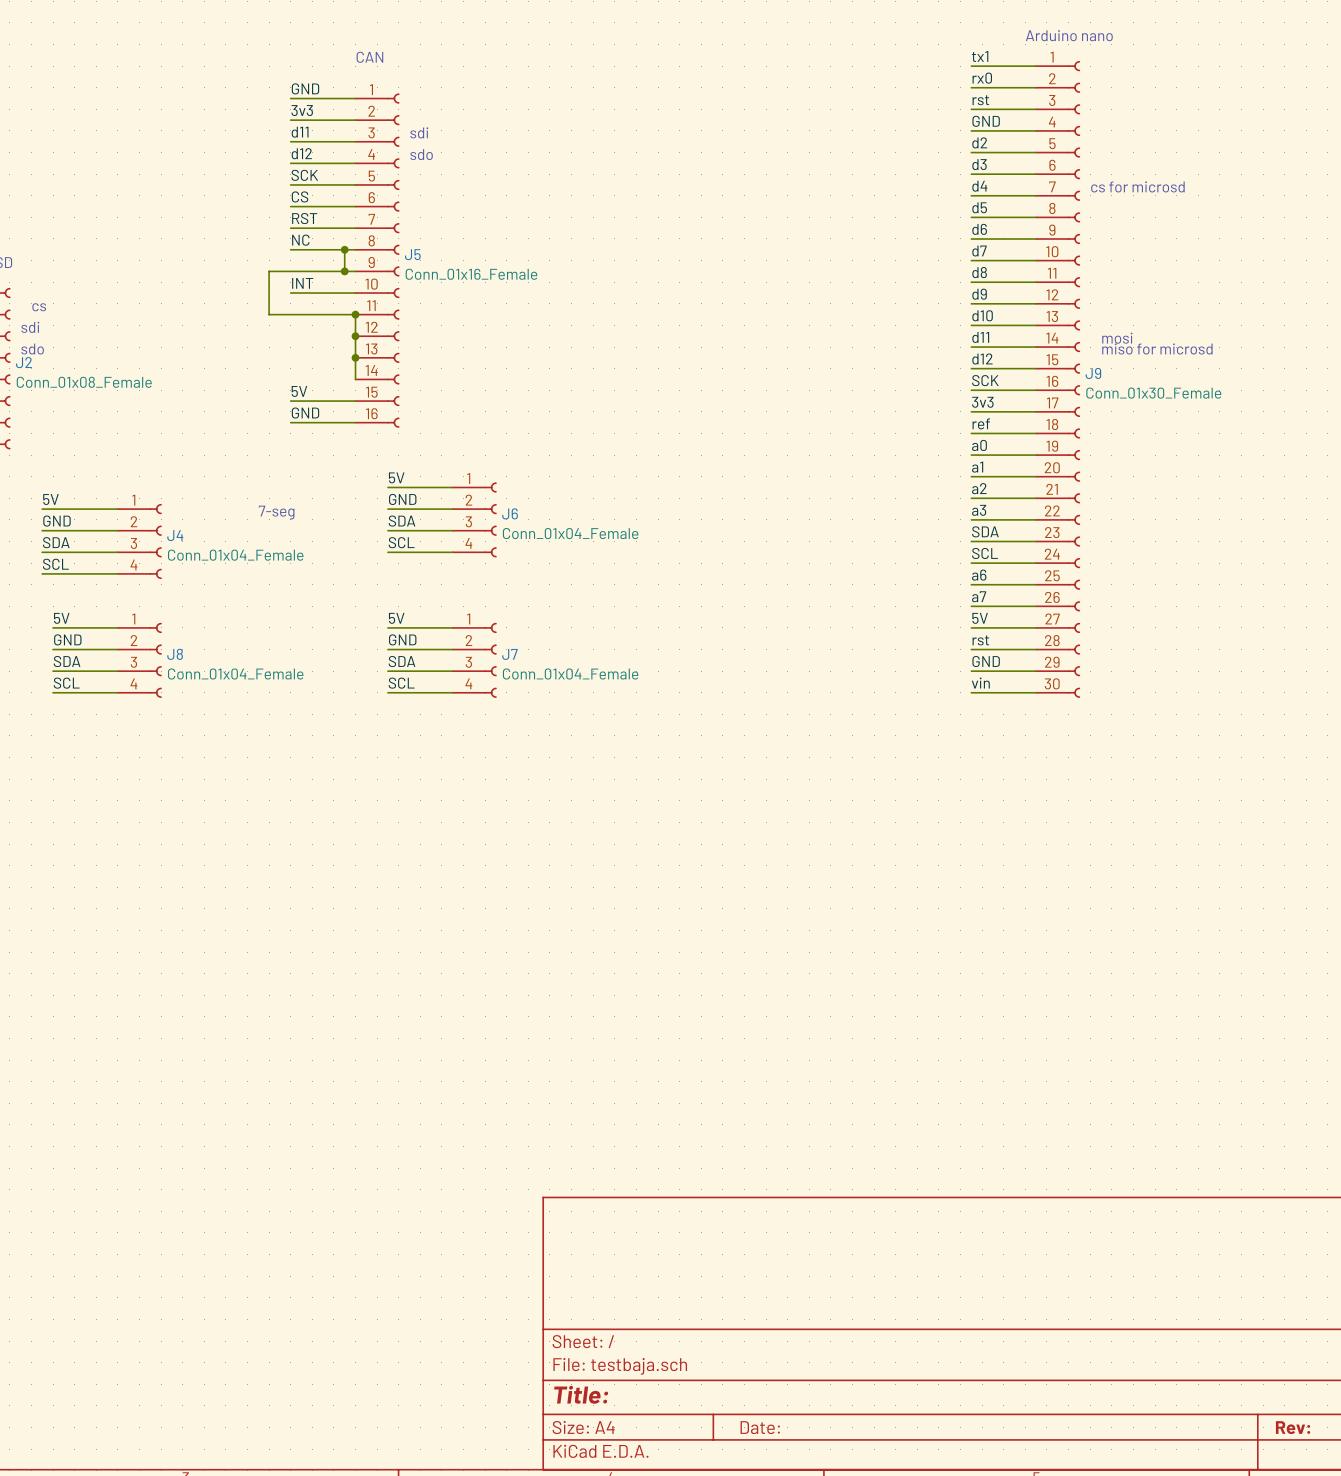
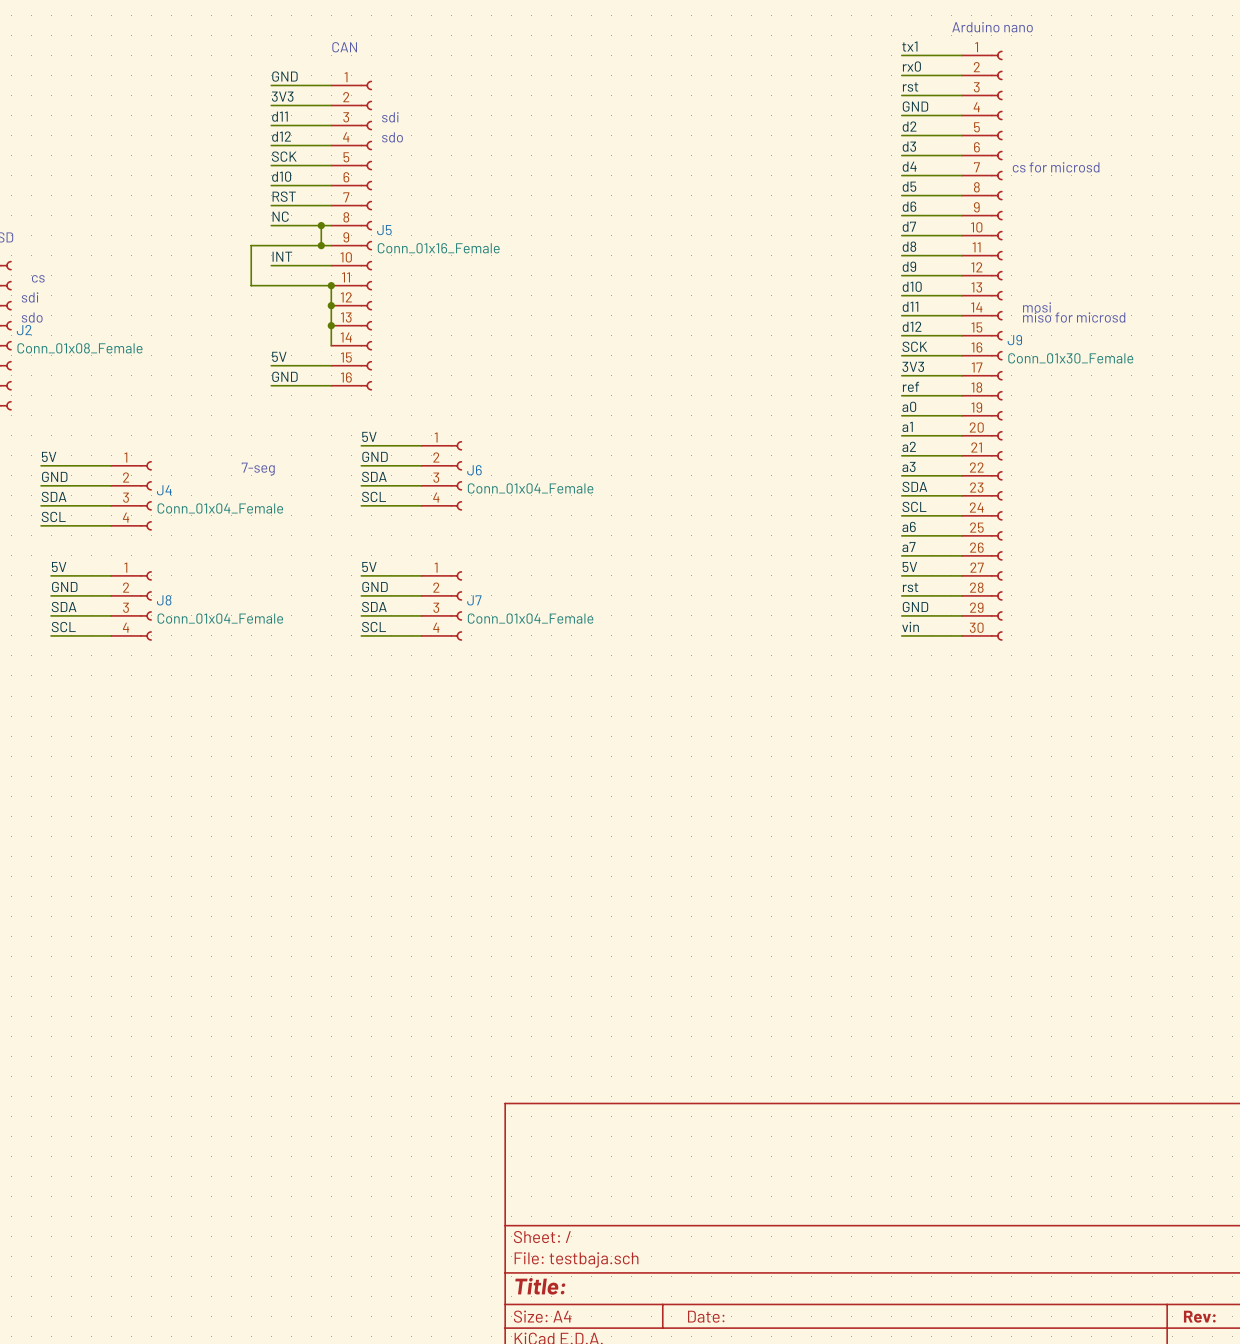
label: 3v3 (302, 110) -> 3V3 (282, 96)
label: CS (300, 196) -> d10 (281, 176)
label: 3v3 (982, 402) -> 3V3 (913, 366)

